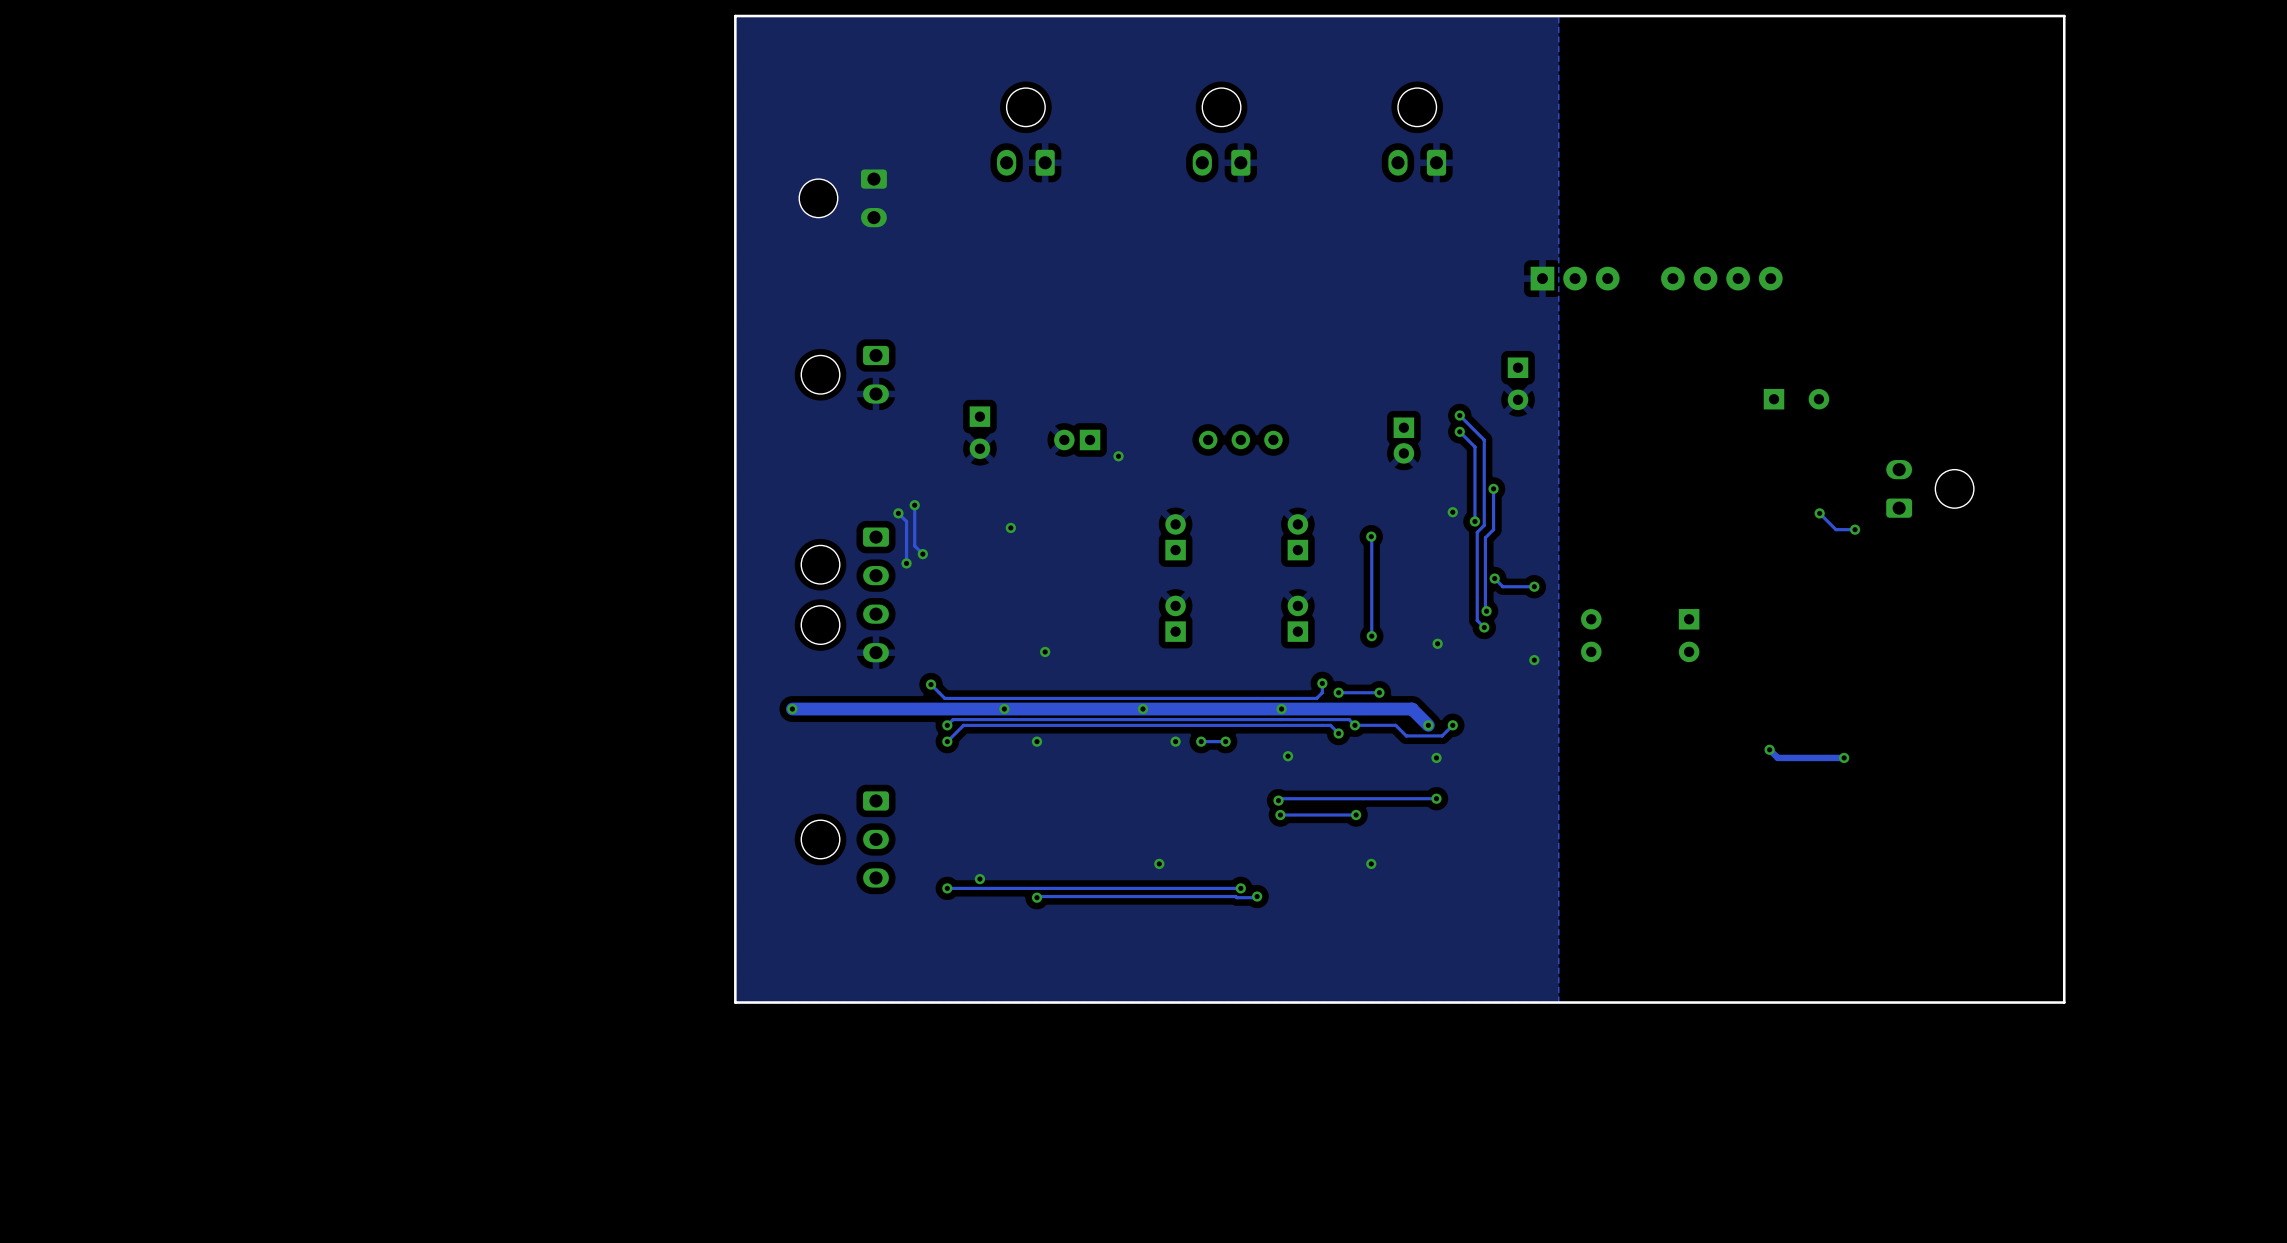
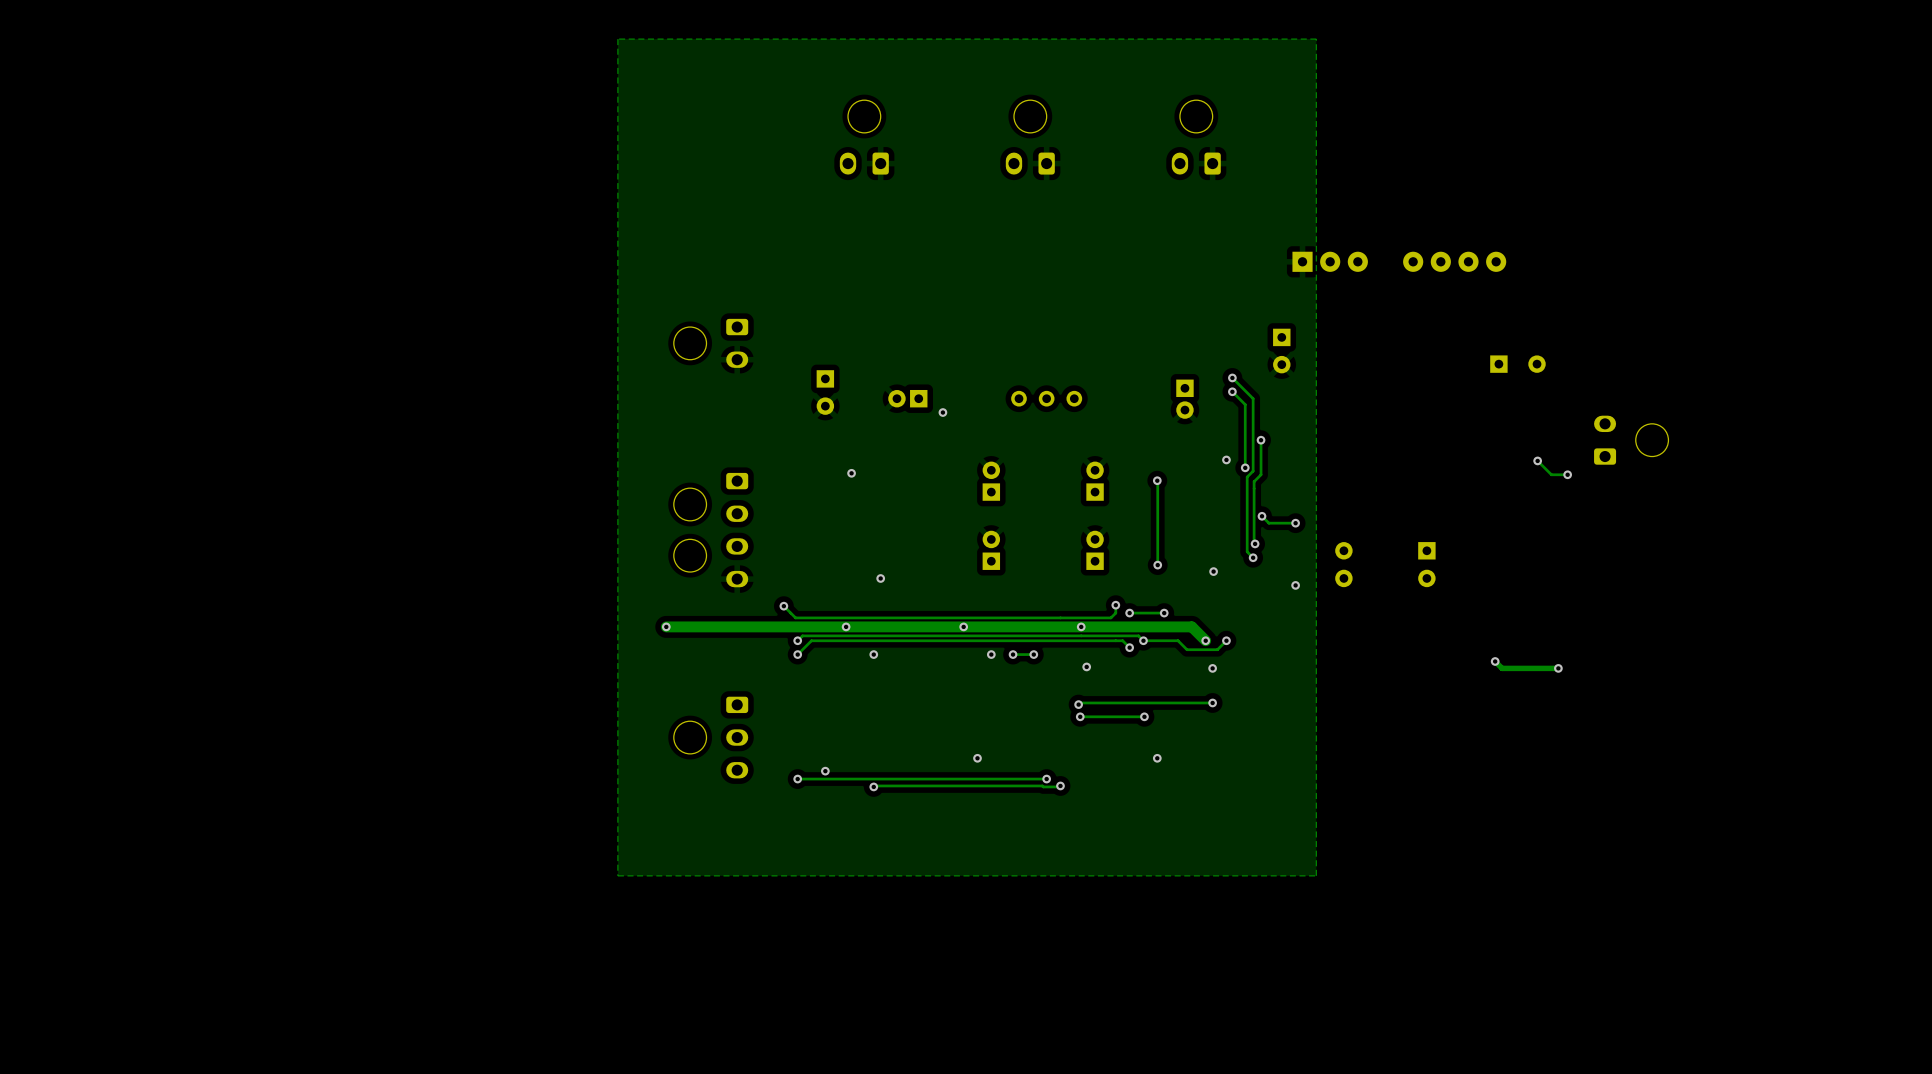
board edge: (2064, 16) (735, 16) (735, 1002) (2064, 1002) (2064, 16) -> none
part: (843, 198) -> none
track: (914, 505) (914, 545) (922, 554) -> none
via: (914, 505) -> none
track: (898, 513) (906, 521) (906, 563) -> none
via: (898, 513) -> none
via: (922, 554) -> none
via: (906, 563) -> none

